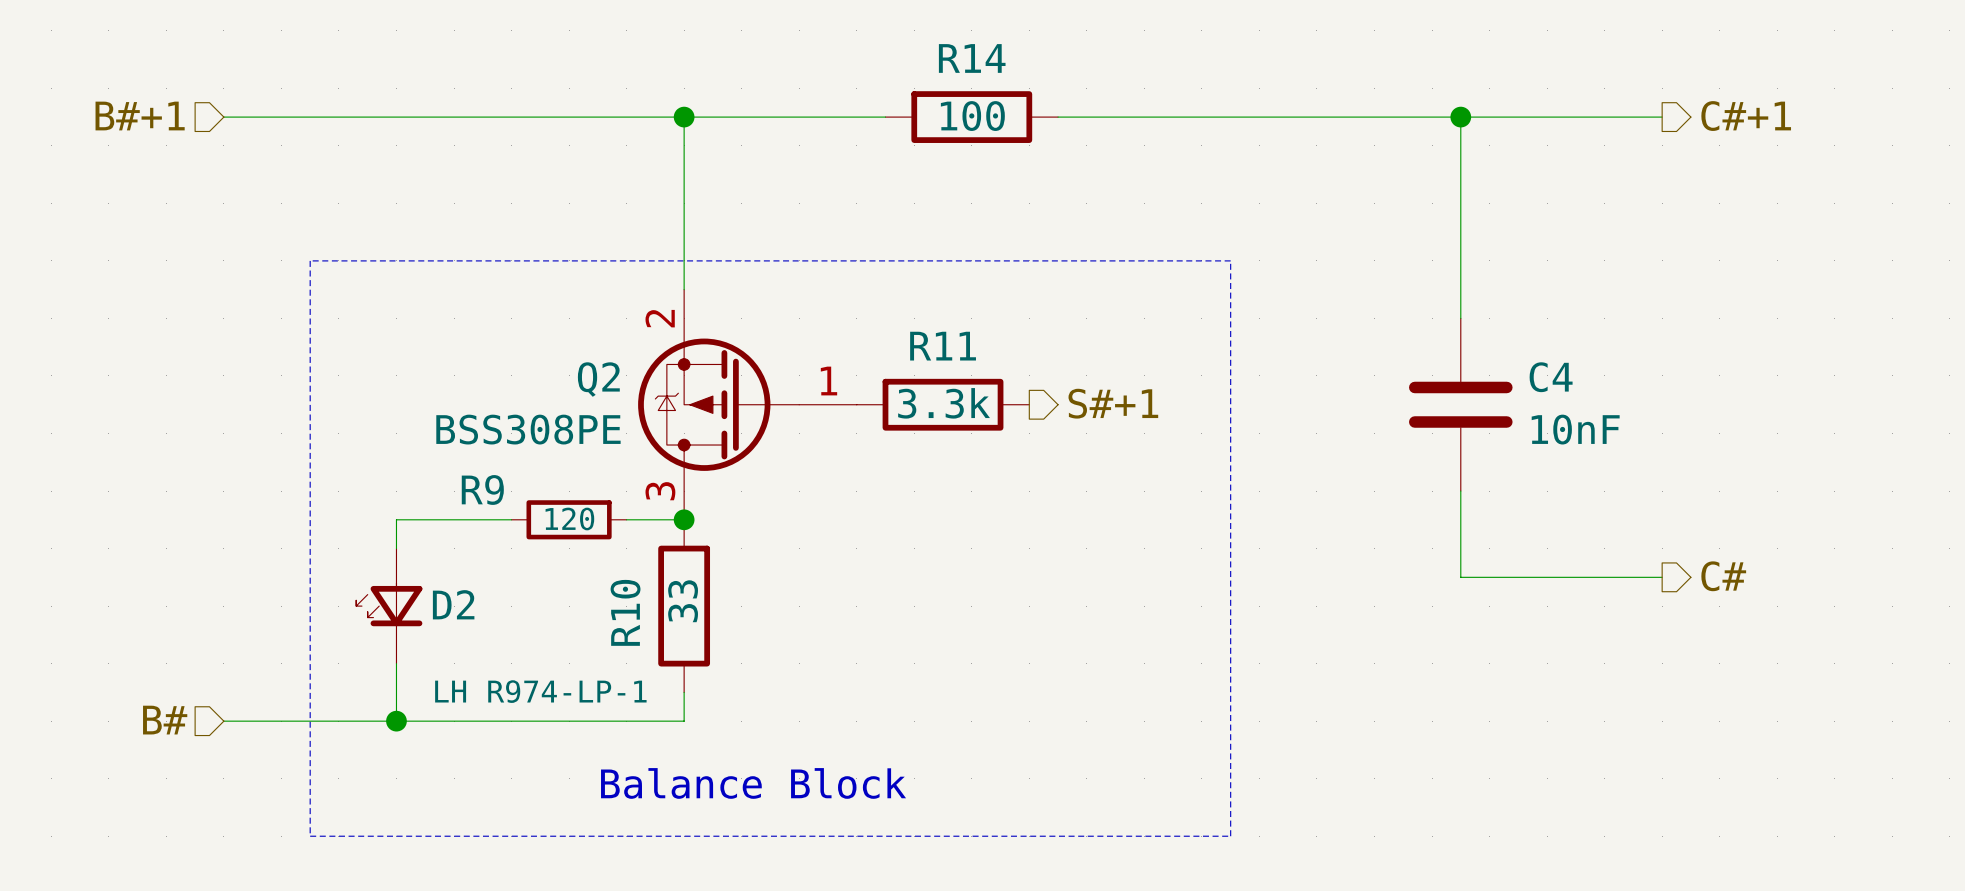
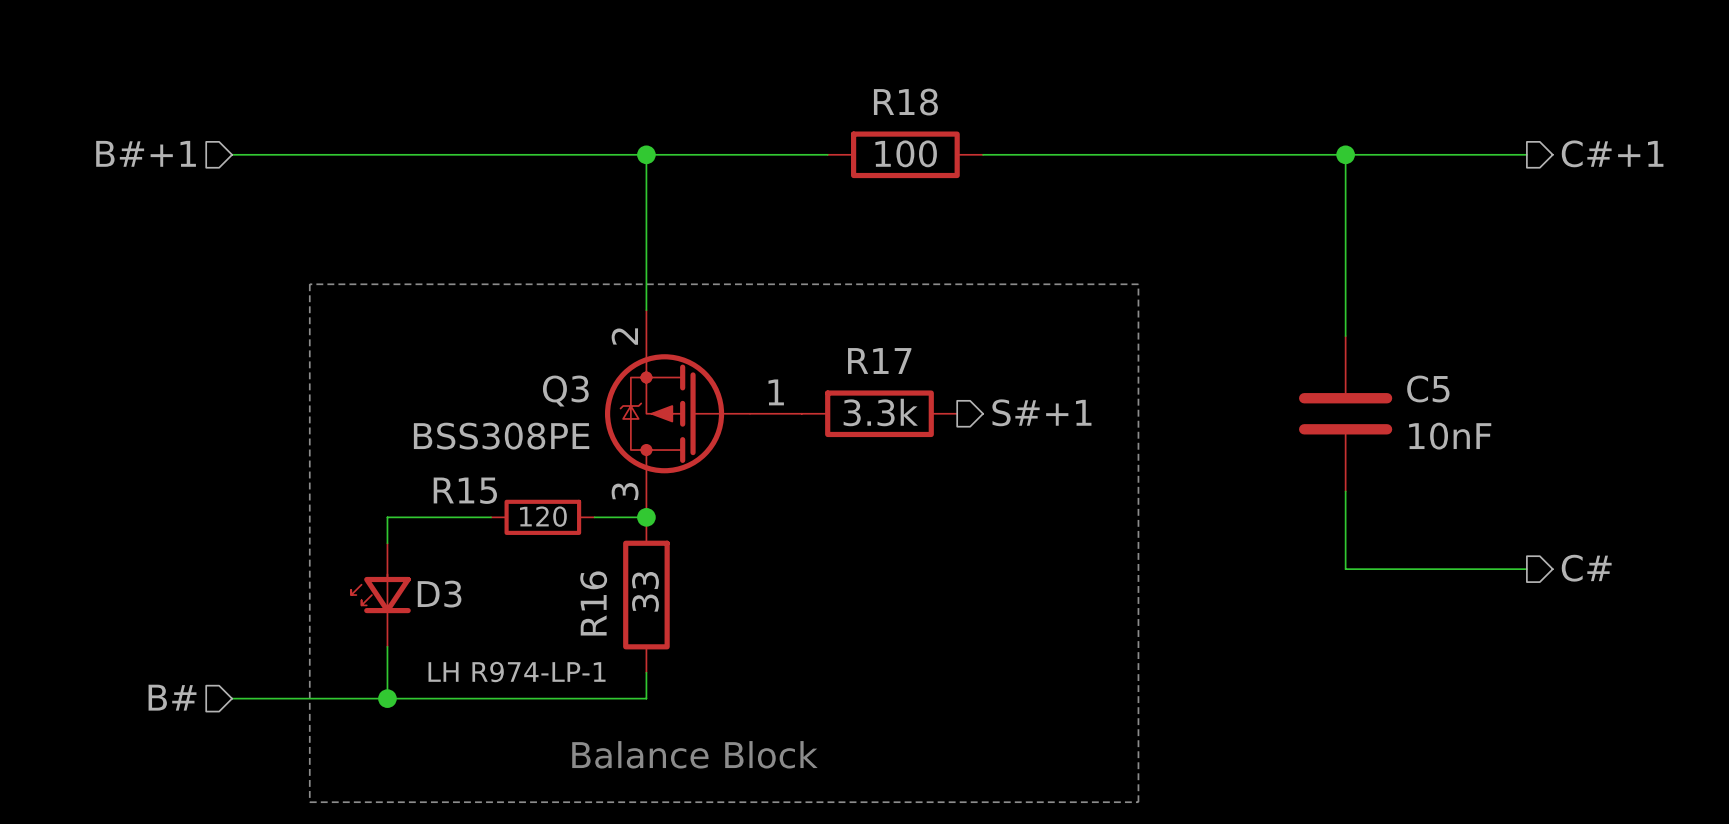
R14 name: R14 (972, 58) -> R18 (905, 102)
R11 name: R11 (943, 346) -> R17 (879, 361)
C4 name: C4 (1551, 377) -> C5 (1428, 388)
Q2 name: Q2 (598, 379) -> Q3 (565, 391)
R9 name: R9 (482, 489) -> R15 (465, 490)
D2 name: D2 (453, 604) -> D3 (439, 594)
R10 name: R10 (625, 612) -> R16 (593, 603)

